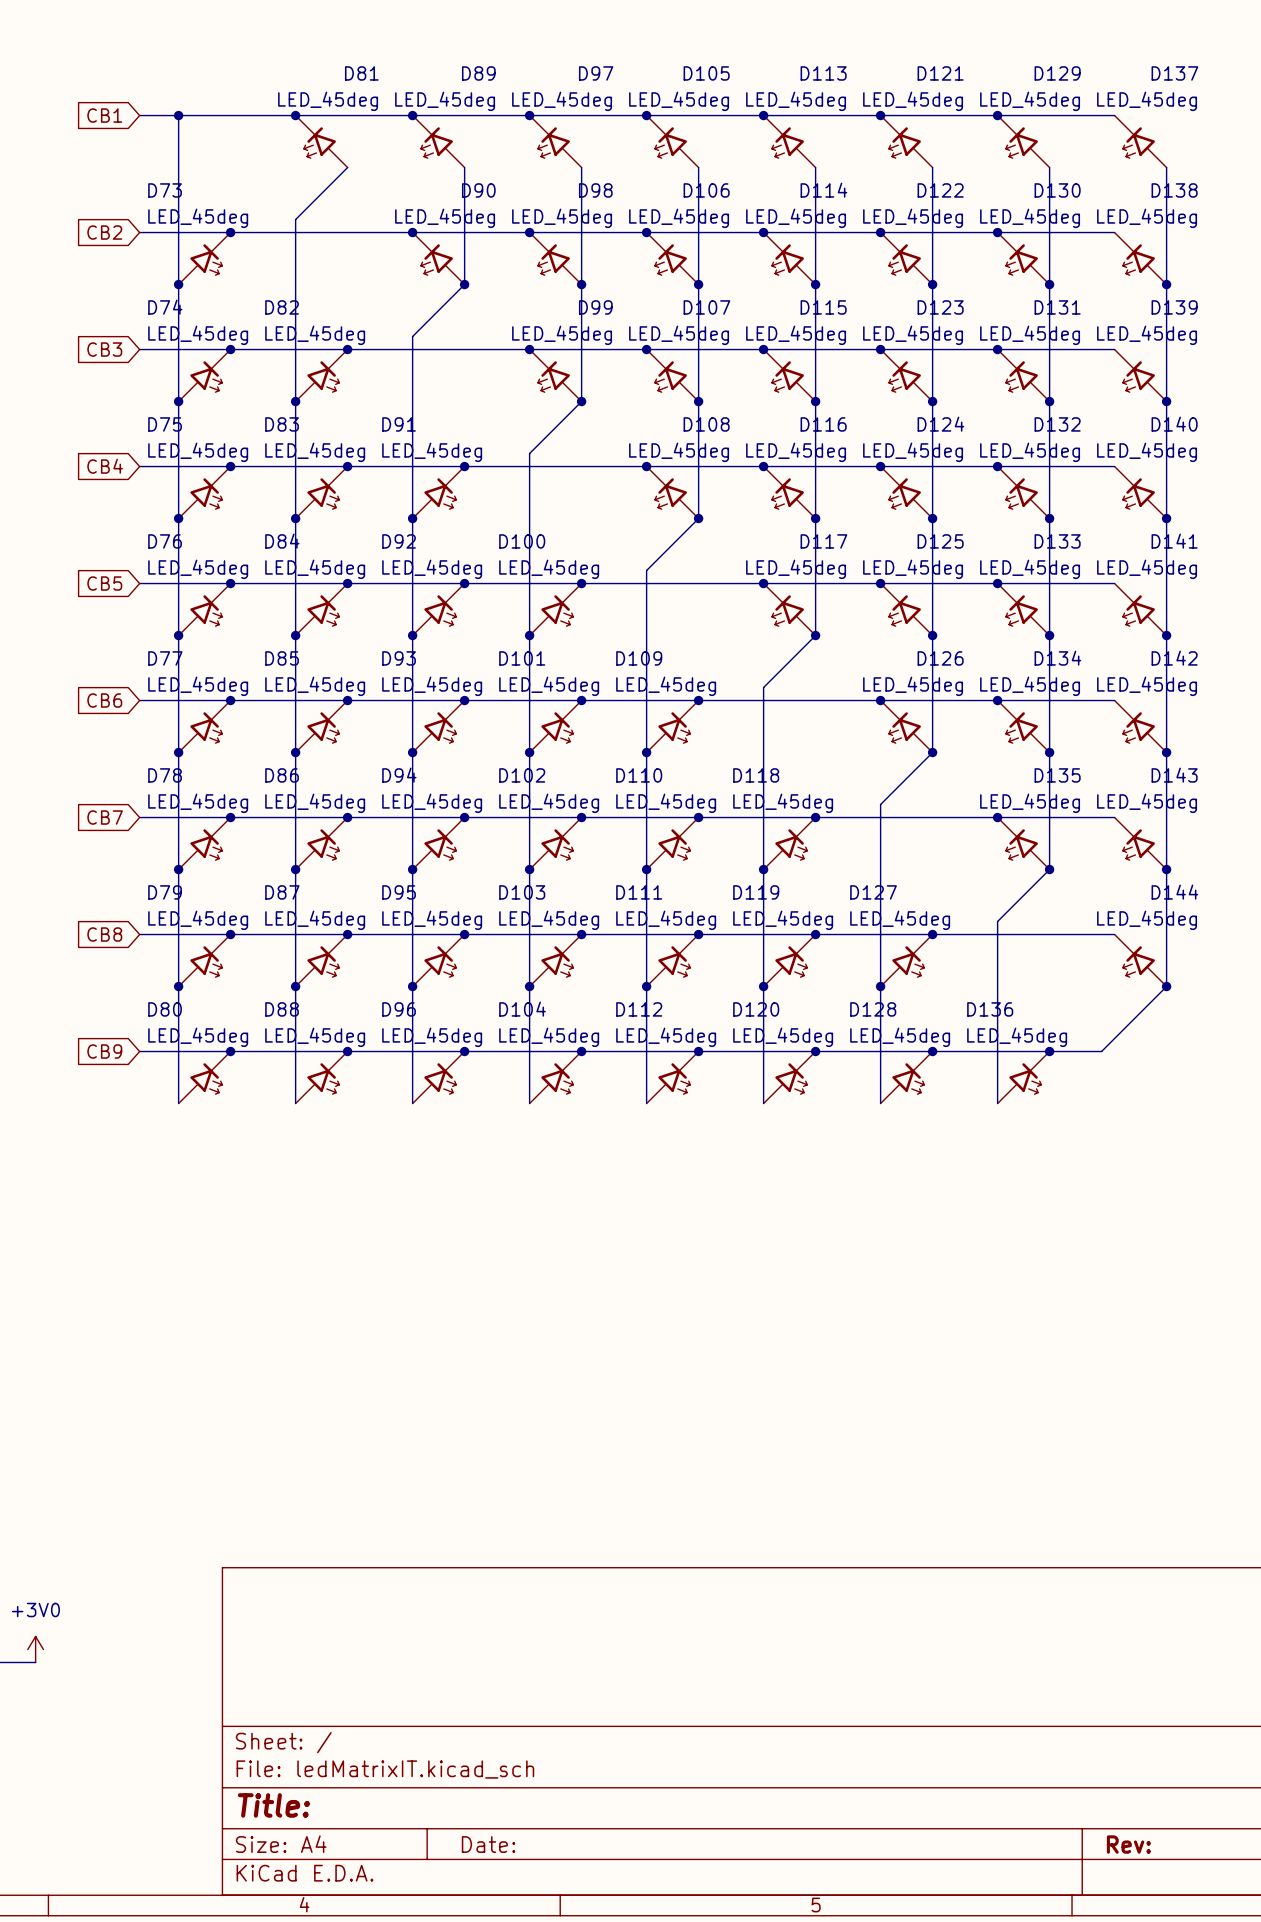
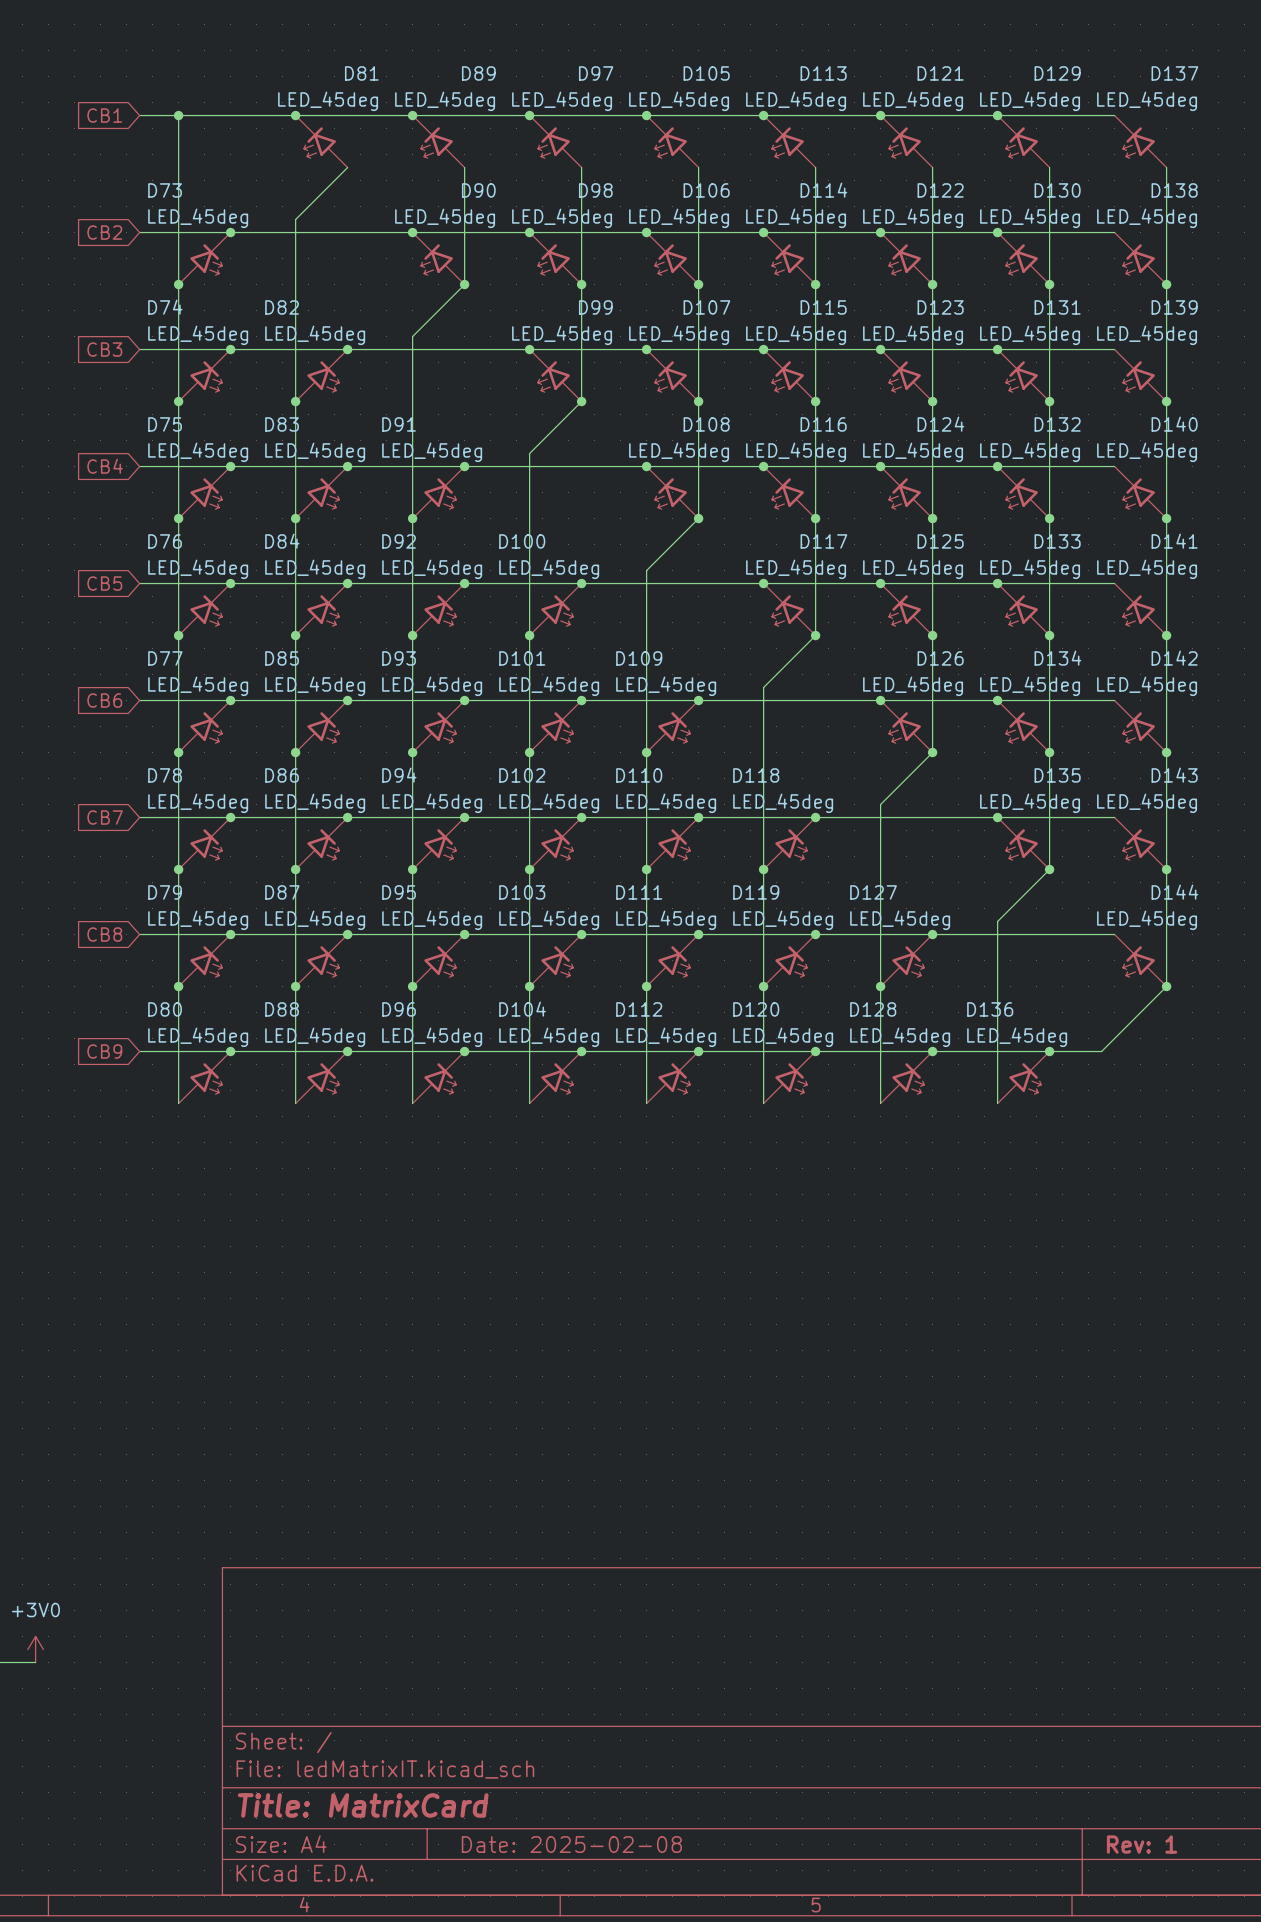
title block: Title: (273, 1805) -> Title: MatrixCard (363, 1805)
title block: Date: (488, 1844) -> Date: 2025-02-08 (571, 1844)
title block: Rev: (1128, 1844) -> Rev: 1 (1142, 1844)

